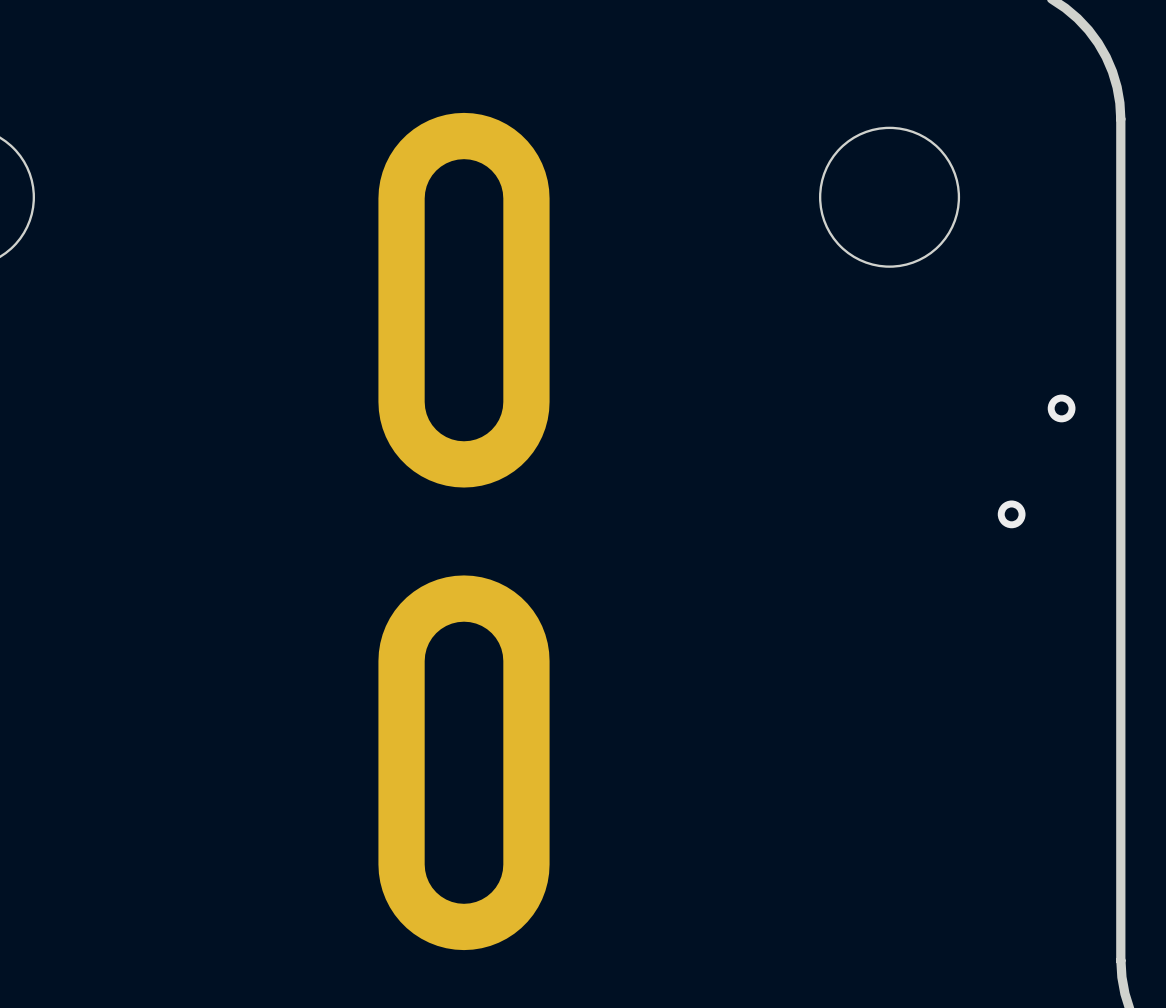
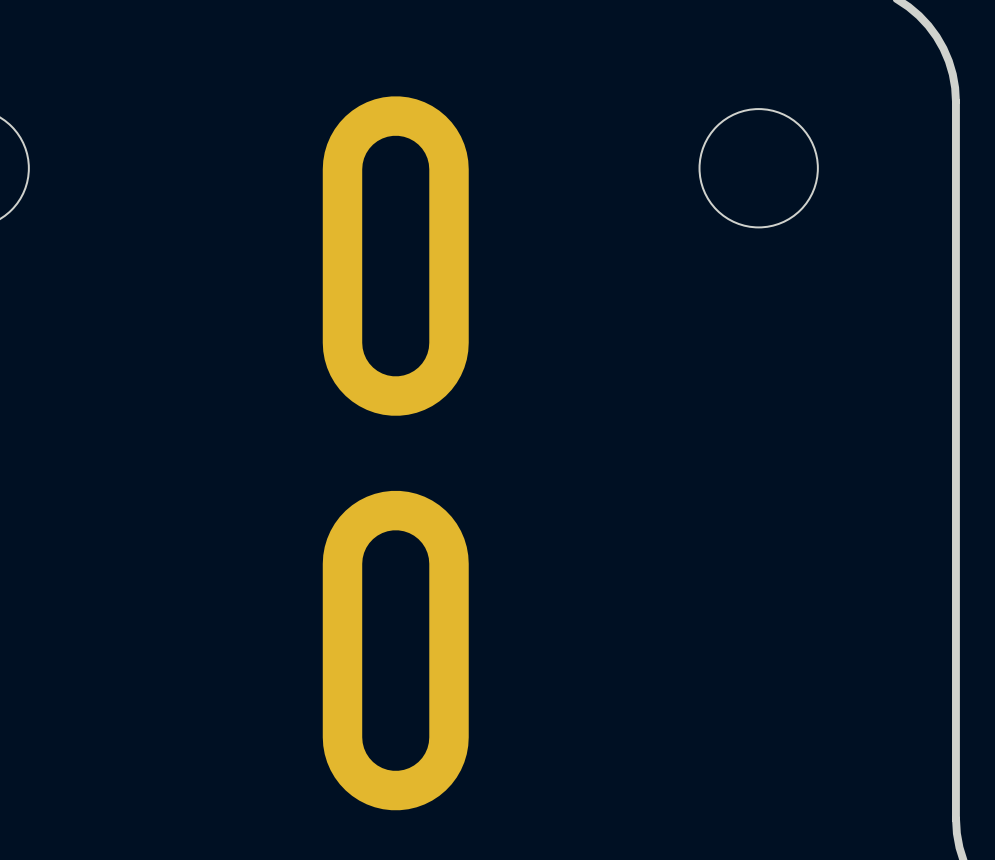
via: (1061, 408) -> none
via: (1011, 514) -> none

